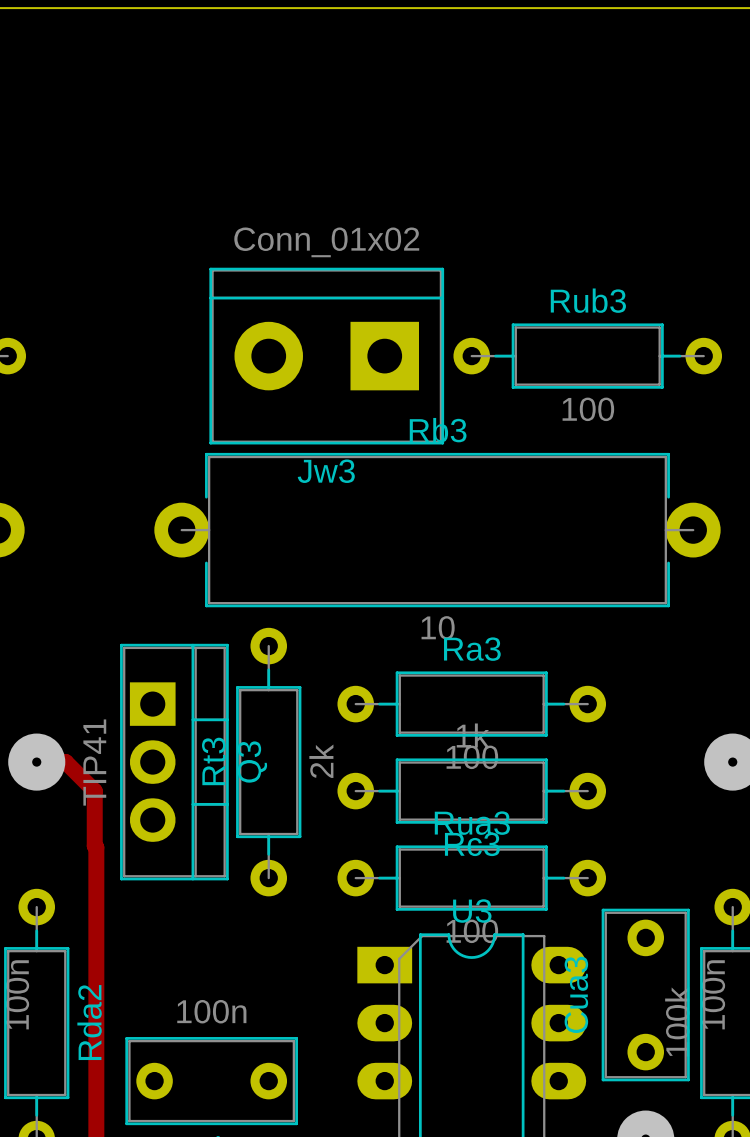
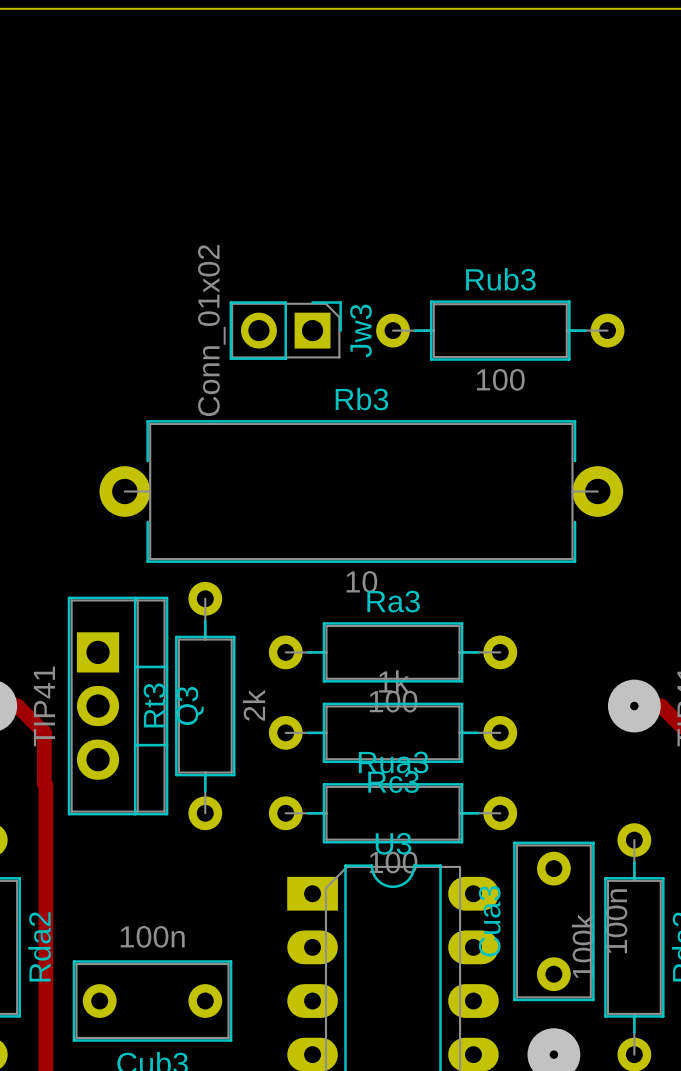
Jw3 value position: Conn_01x02 (326, 242) -> Conn_01x02 (211, 330)
Jw3 footprint: [209, 267, 445, 445] -> [229, 301, 342, 360]
Jw3 name position: Jw3 (326, 471) -> Jw3 (360, 331)

